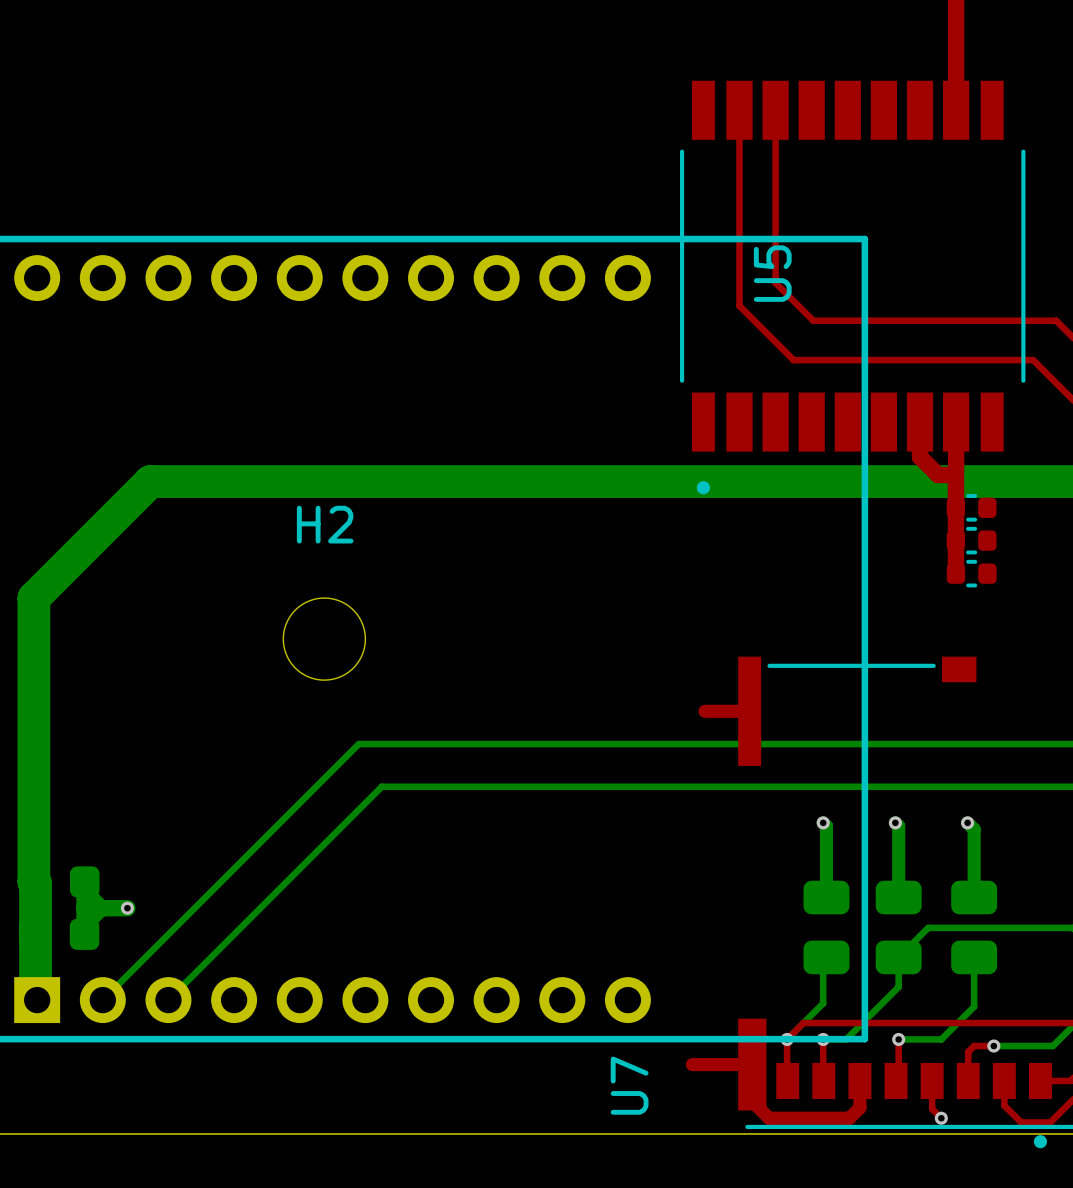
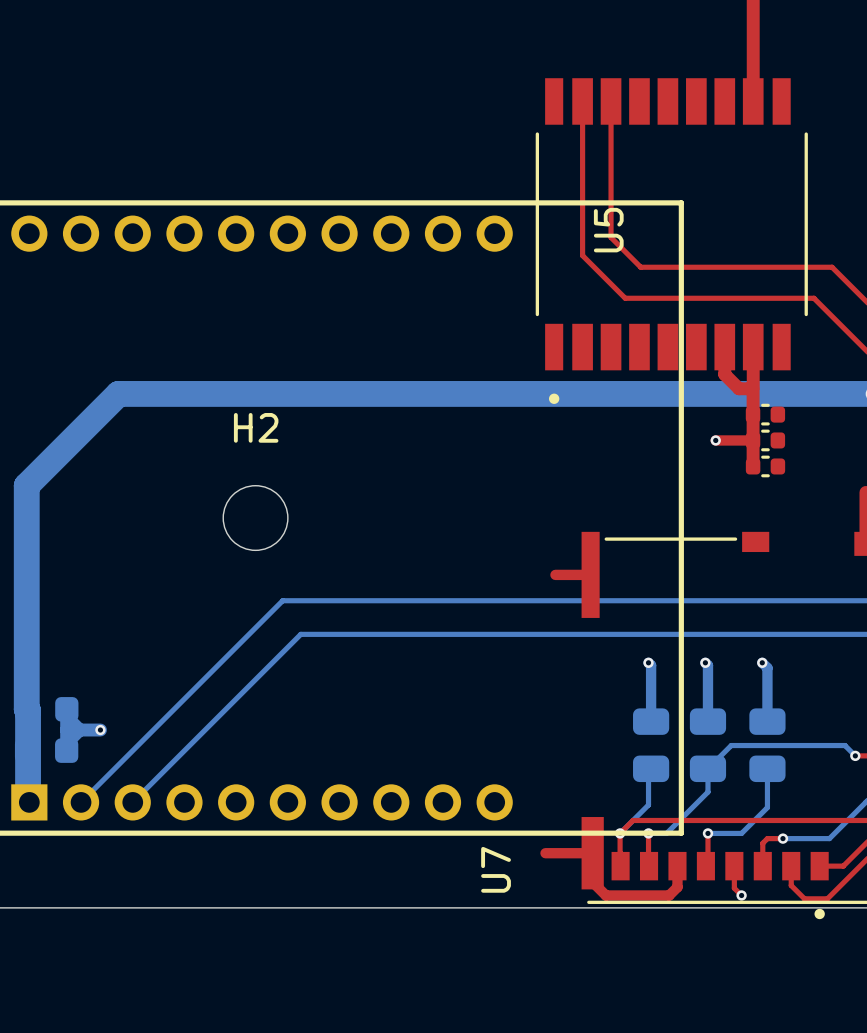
top track: none -> (715, 440) (753, 440)
via: none -> (715, 440)

